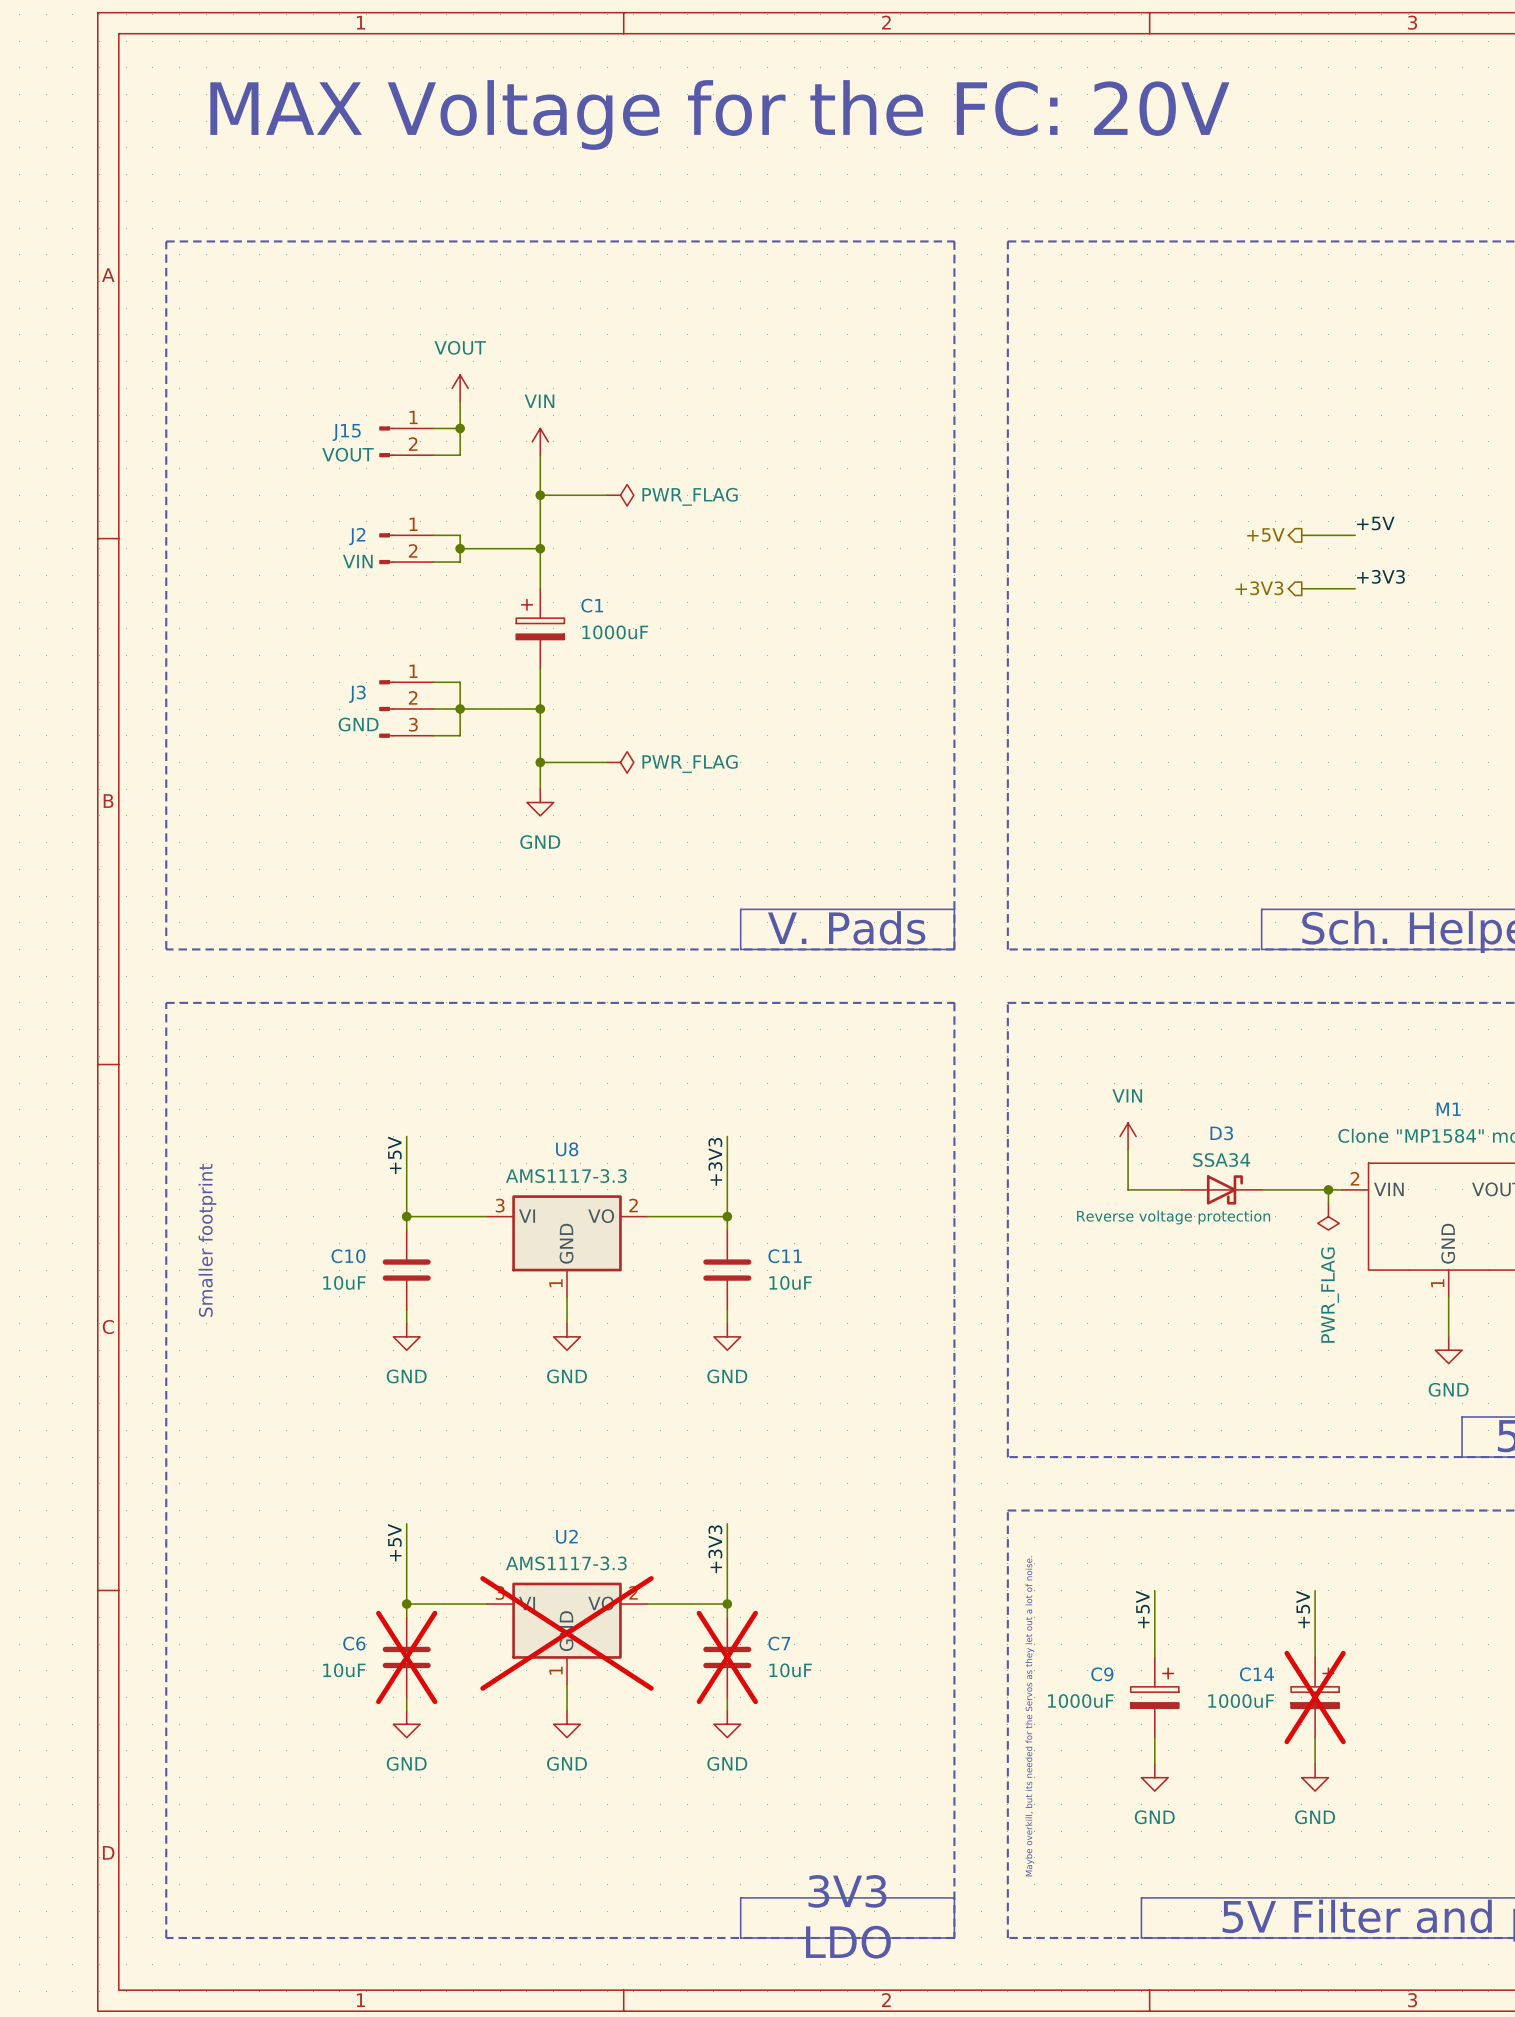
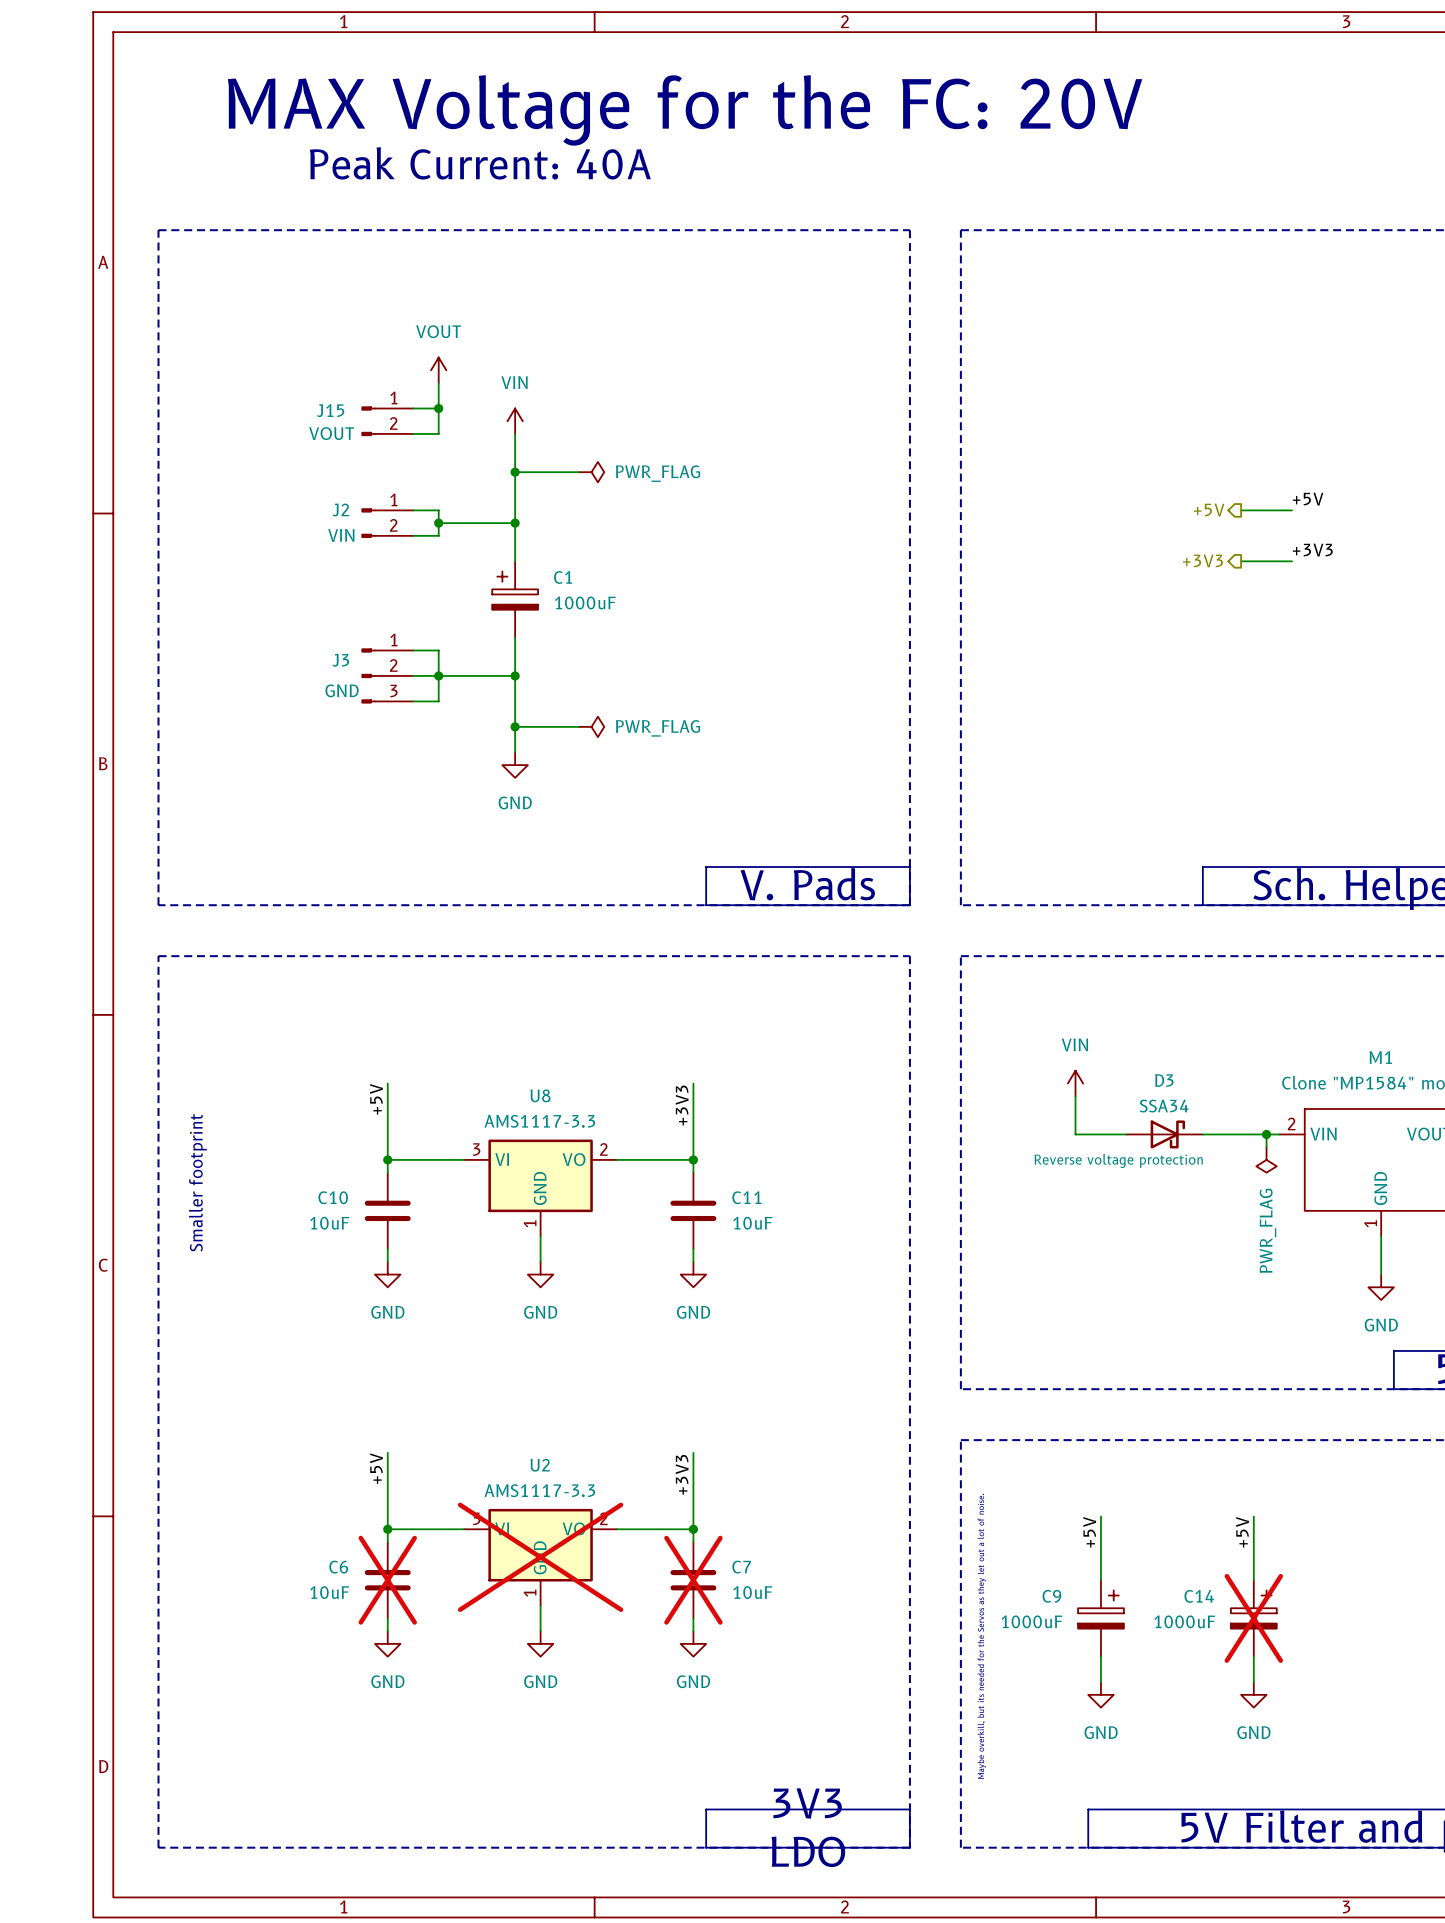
text: none -> Peak Current: 40A (480, 163)

